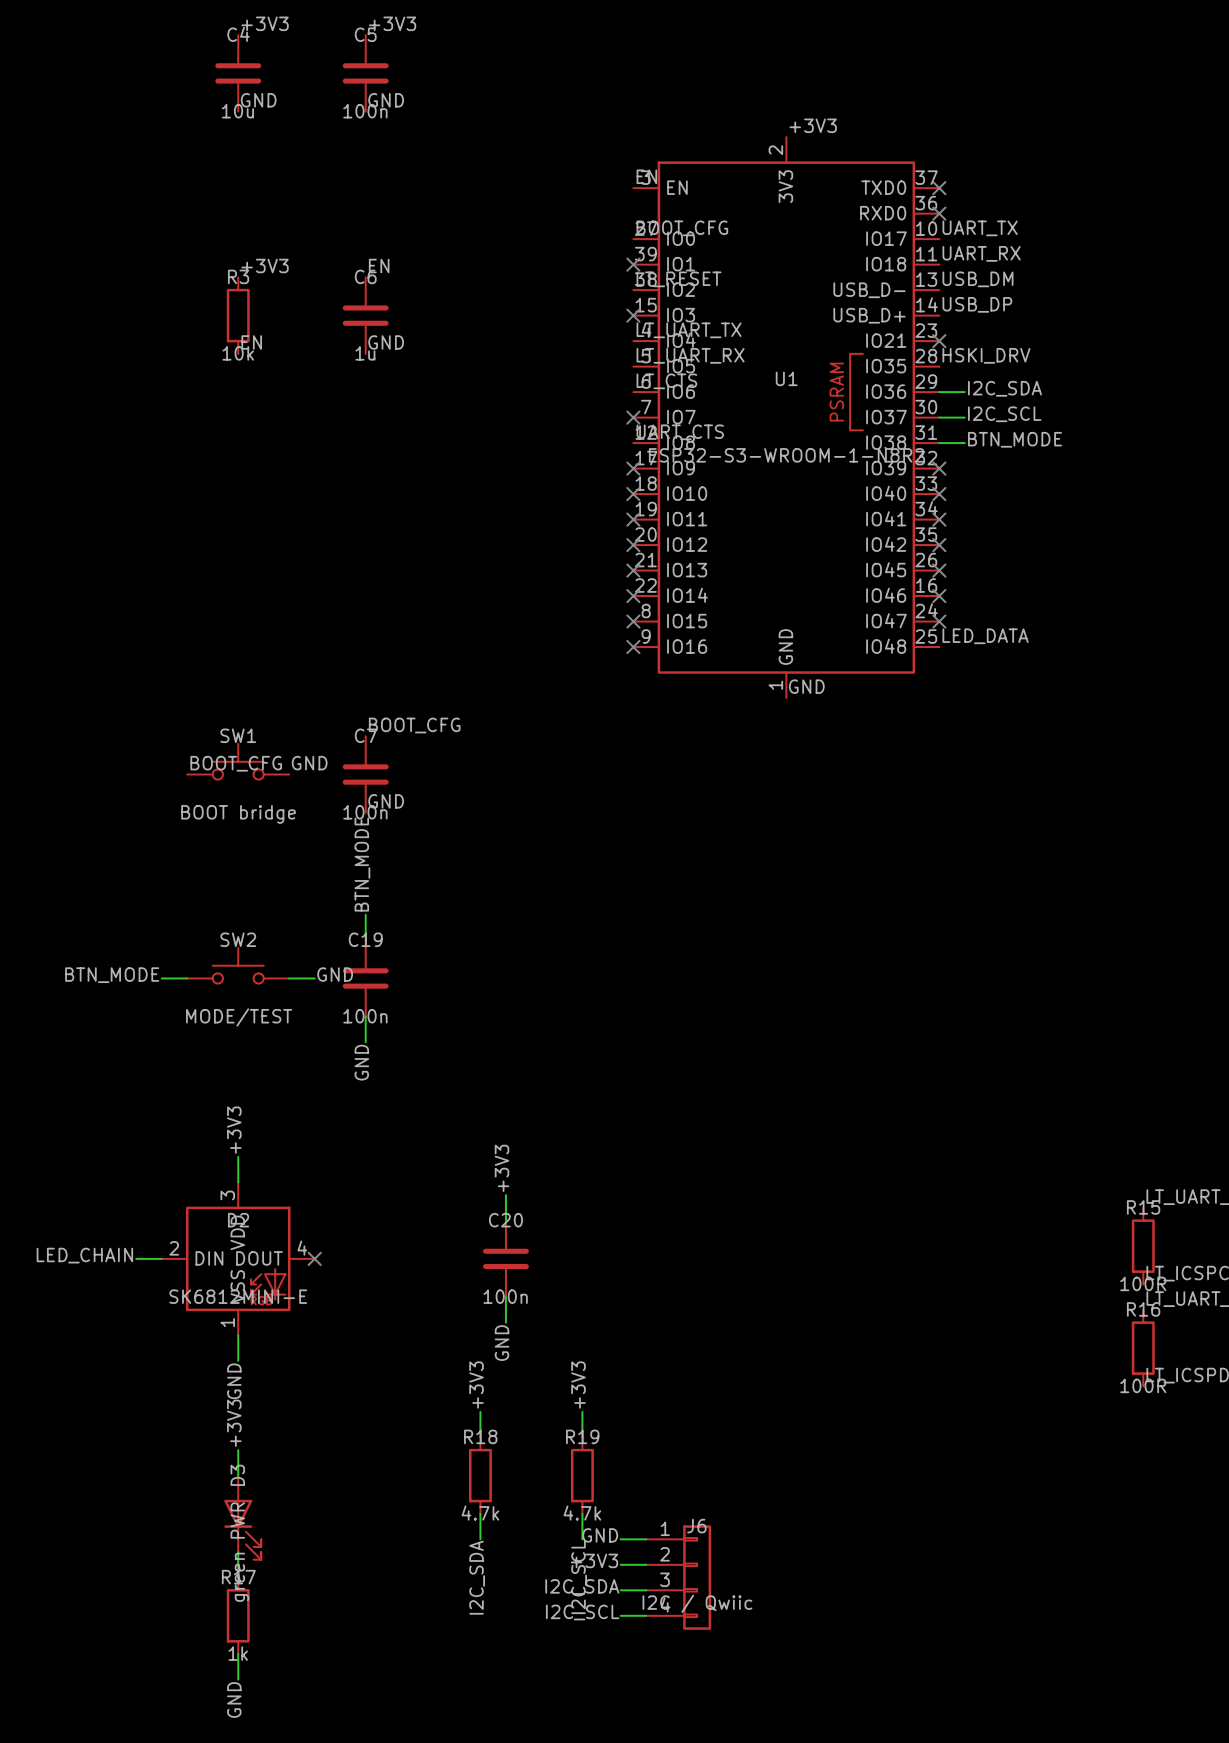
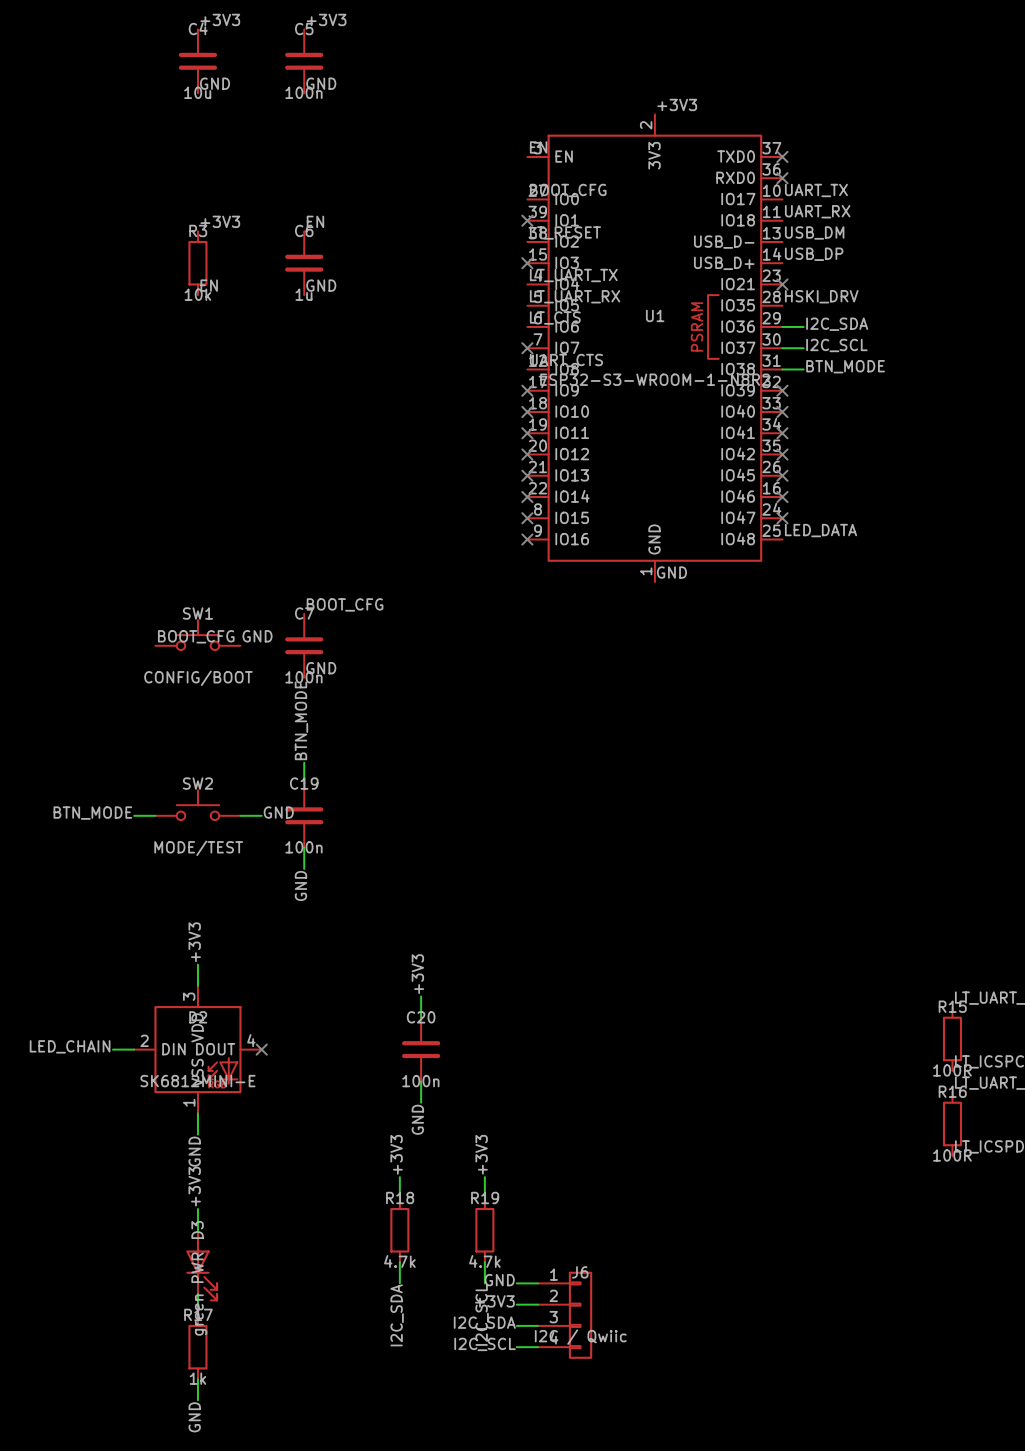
SW1 value: BOOT bridge (238, 814) -> CONFIG/BOOT (198, 678)

